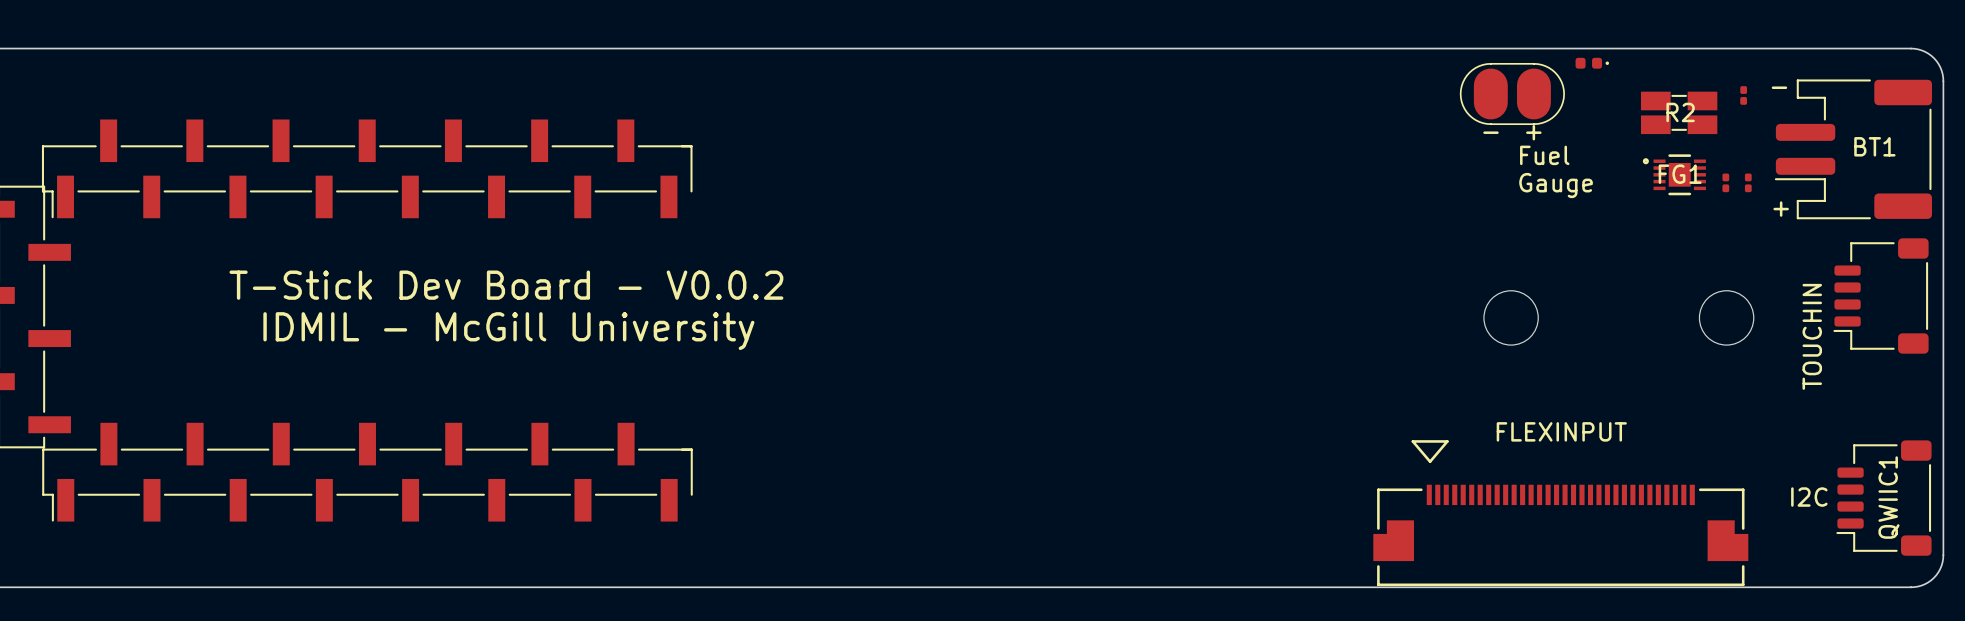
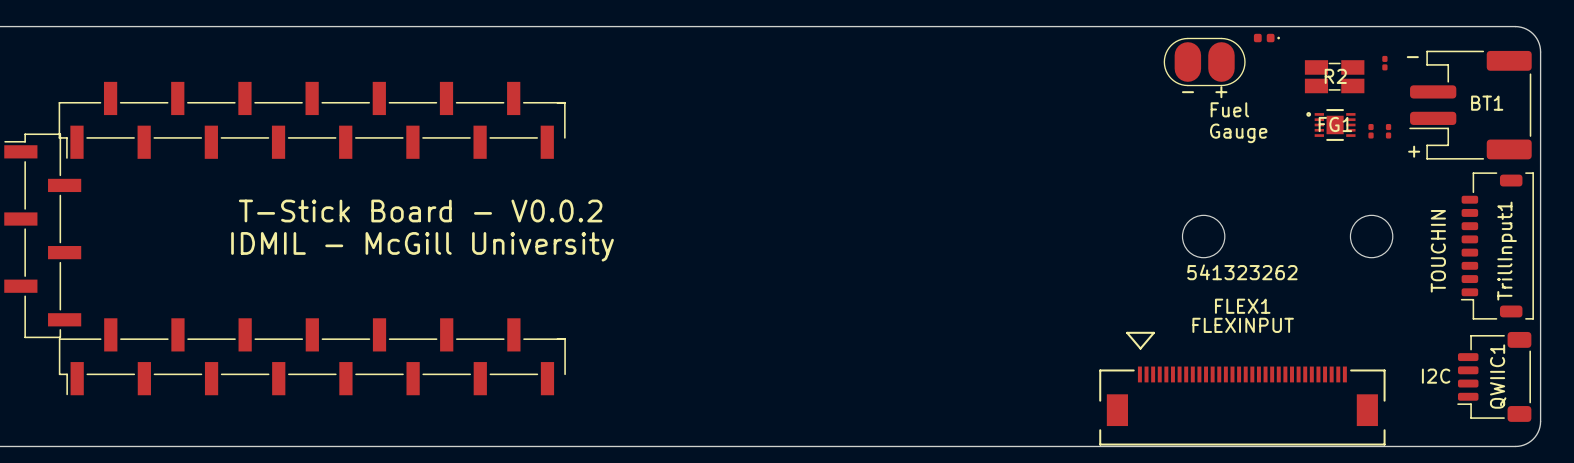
text: T-Stick Dev Board - V0.0.2 (506, 285) -> T-Stick Board - V0.0.2 (420, 210)
part: (1881, 295) -> none
TrillInput1: none -> (1497, 246)
part: (1560, 513) -> none
FLEX1: none -> (1242, 388)

